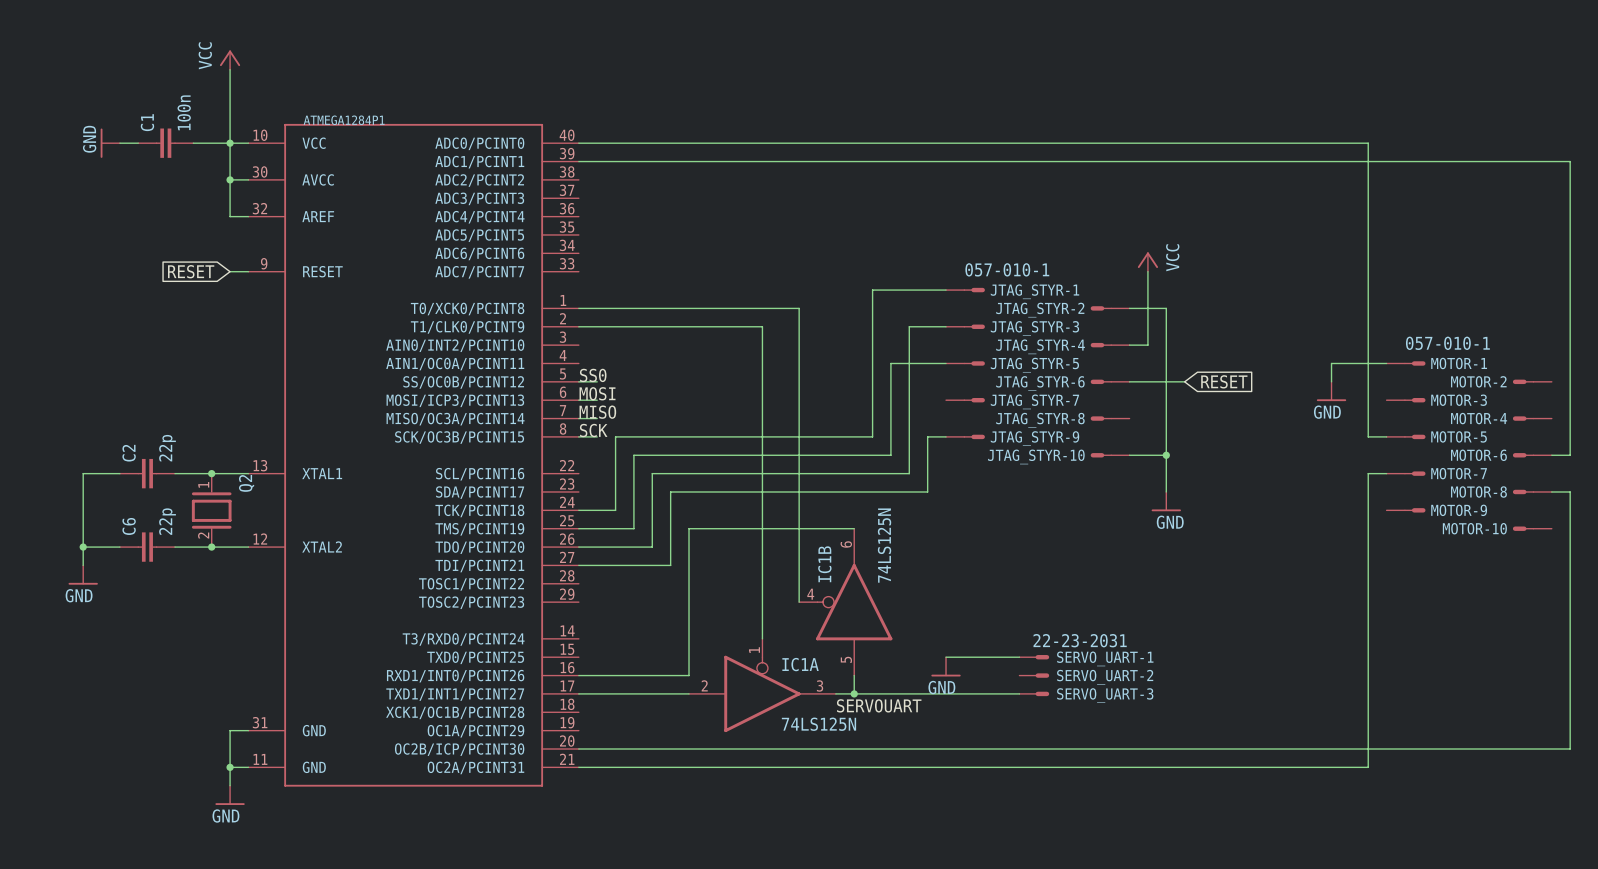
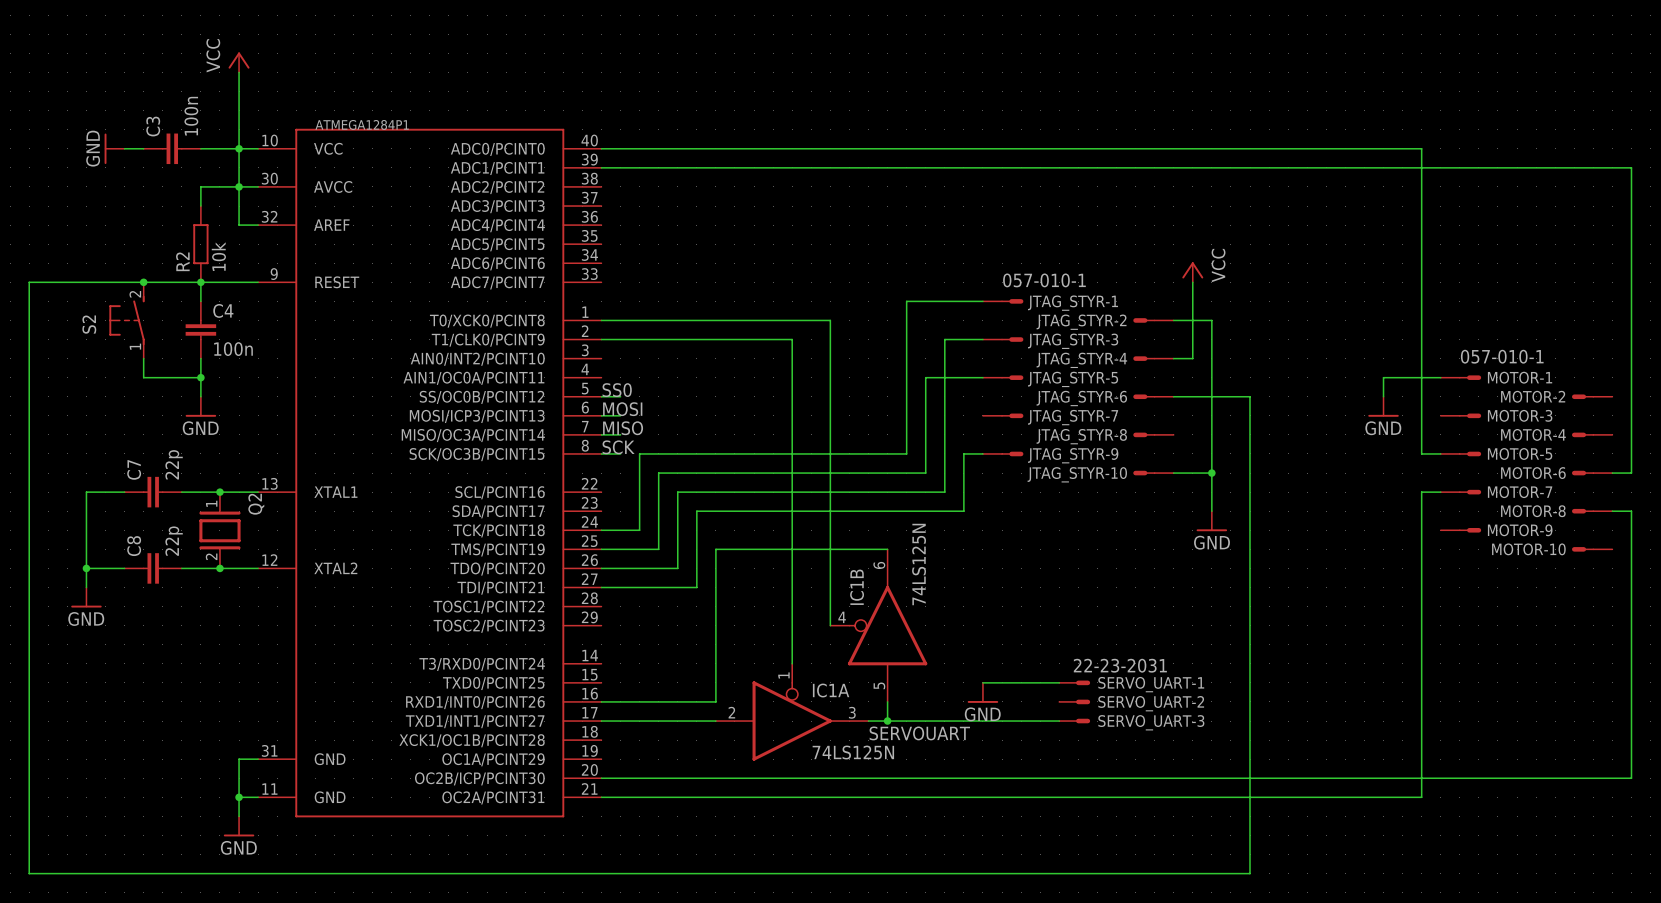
C1 name: C1 (147, 122) -> C3 (153, 126)
wire: none -> (239, 186) (200, 186) (200, 206)
R2: none -> 10k (200, 244)
junction: none -> (143, 282)
global label: RESET (191, 271) -> none
wire: none -> (200, 282) (200, 301)
junction: none -> (200, 282)
wire: none -> (239, 282) (29, 282) (29, 873) (1250, 873) (1250, 396) (1230, 396)
S2: none -> (126, 320)
C4: none -> 100n (200, 329)
wire: none -> (143, 358) (143, 377) (200, 377)
wire: none -> (200, 358) (200, 396)
junction: none -> (200, 377)
global label: RESET (1224, 381) -> none
power symbol: none -> GND (200, 406)
C2 name: C2 (129, 453) -> C7 (134, 469)
C6 name: C6 (129, 526) -> C8 (134, 546)

